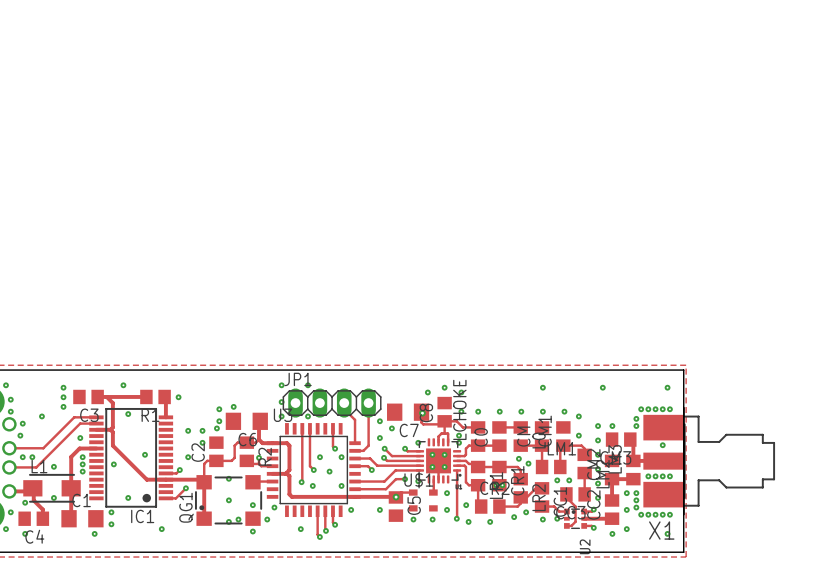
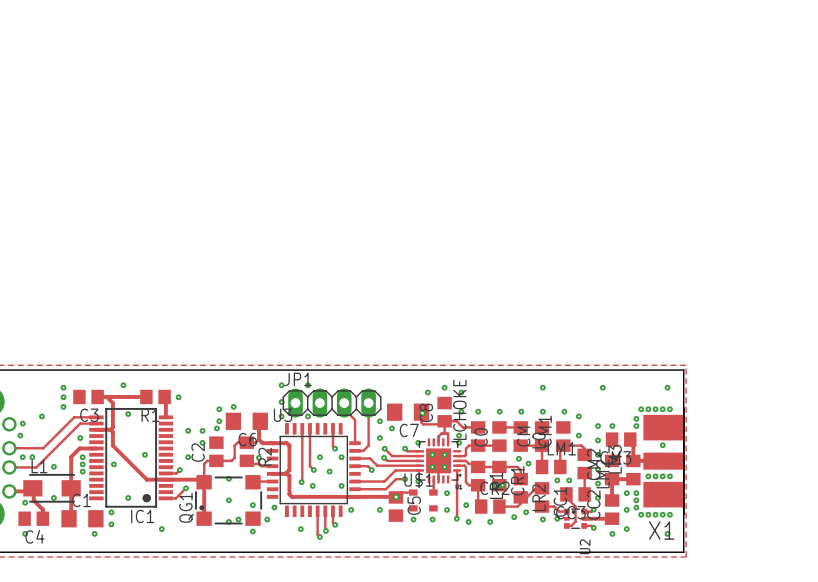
via: (5, 385) -> none
via: (10, 399) -> none
X1 footprint: [643, 407, 776, 515] -> [643, 407, 684, 515]
via: (10, 411) -> none
via: (10, 512) -> none
via: (5, 529) -> none

